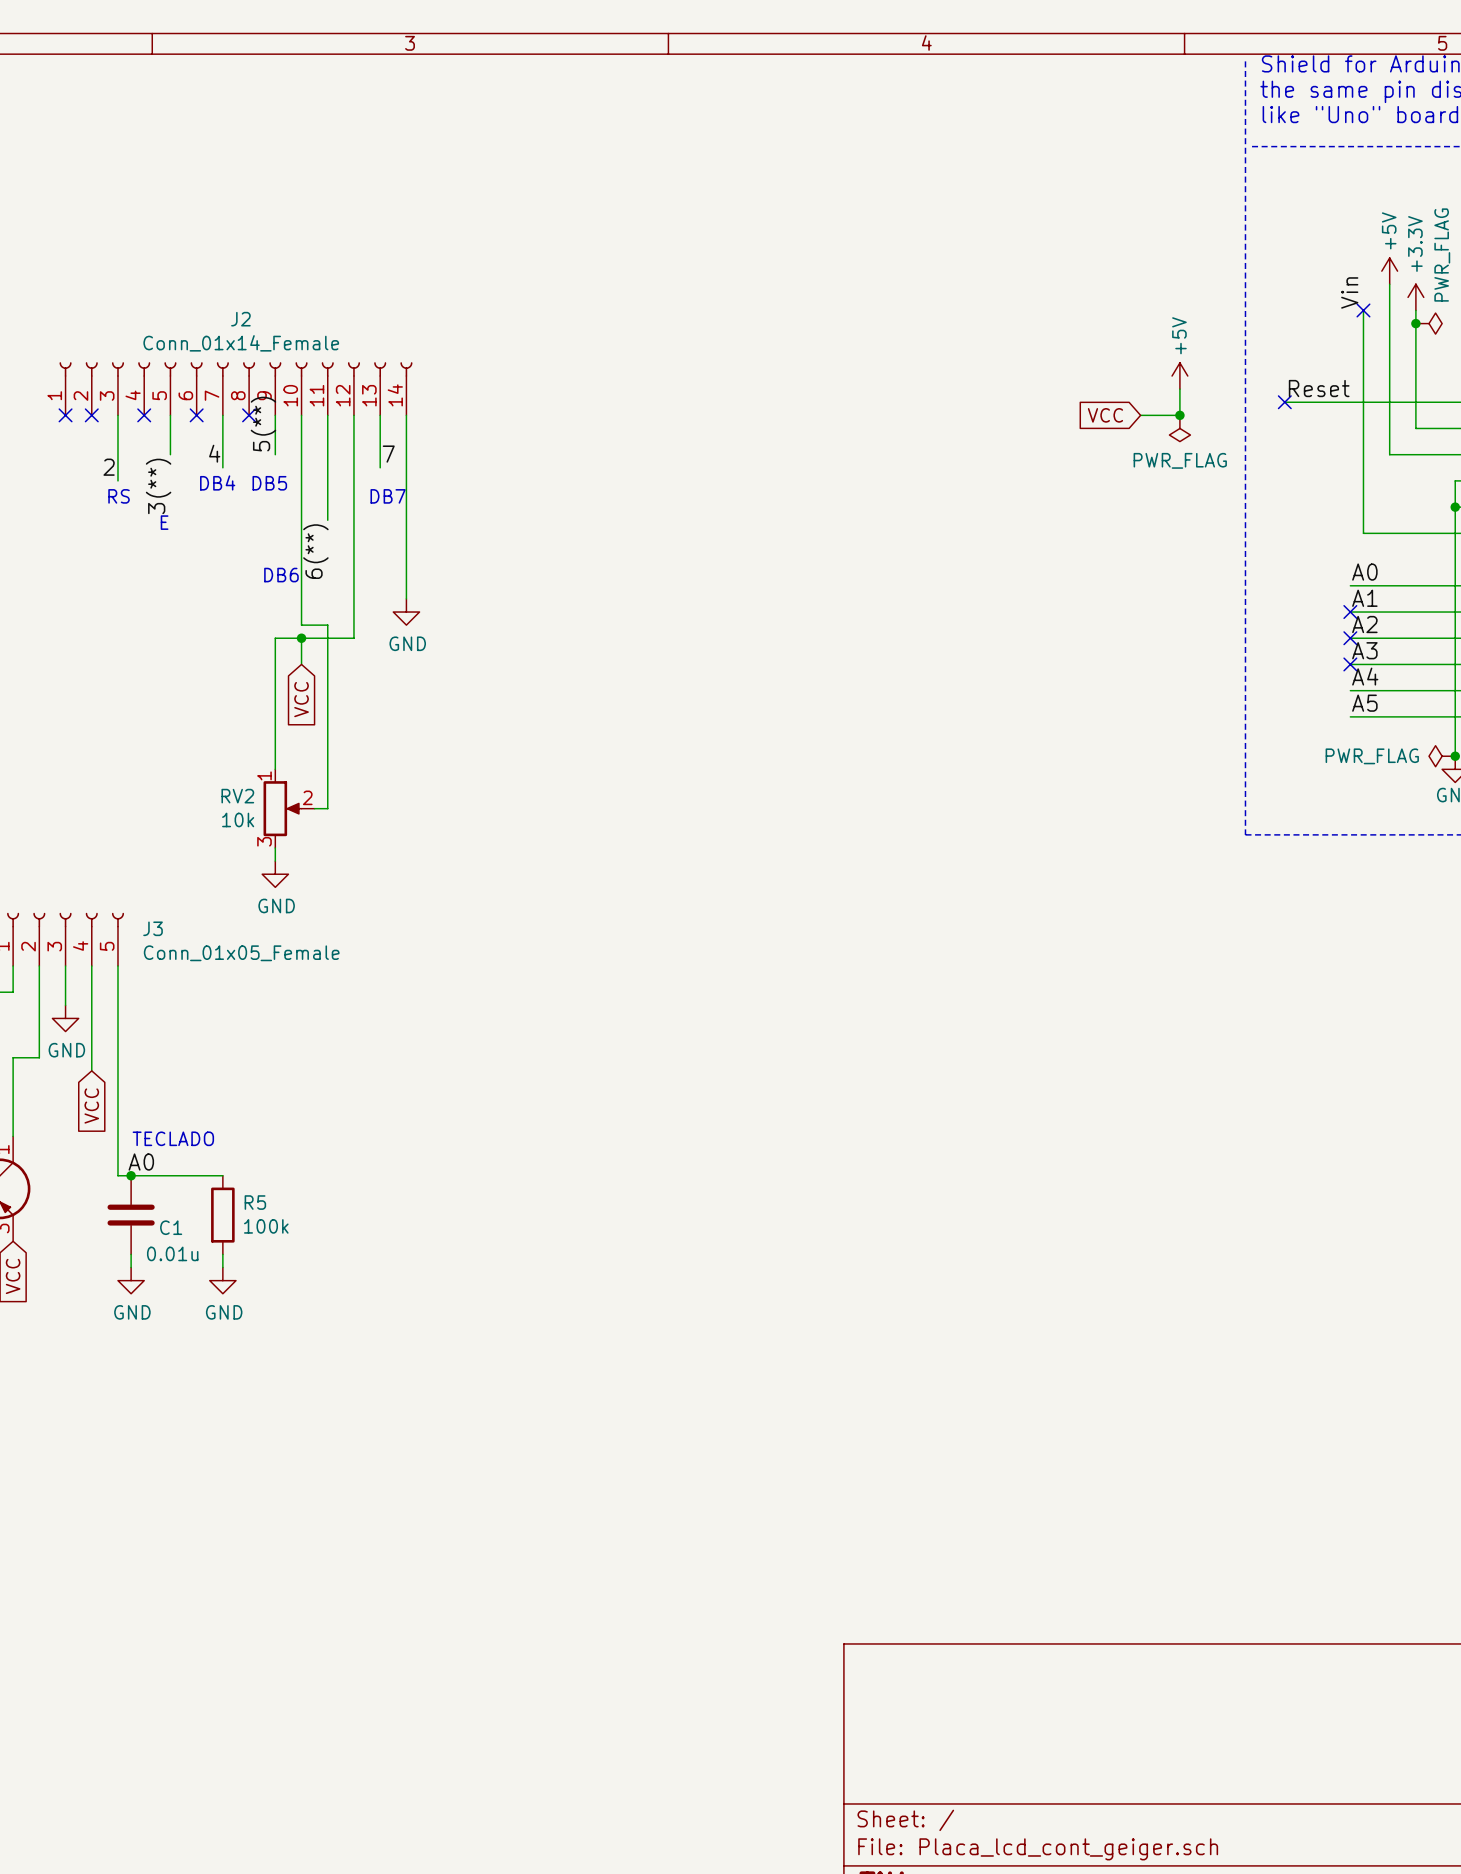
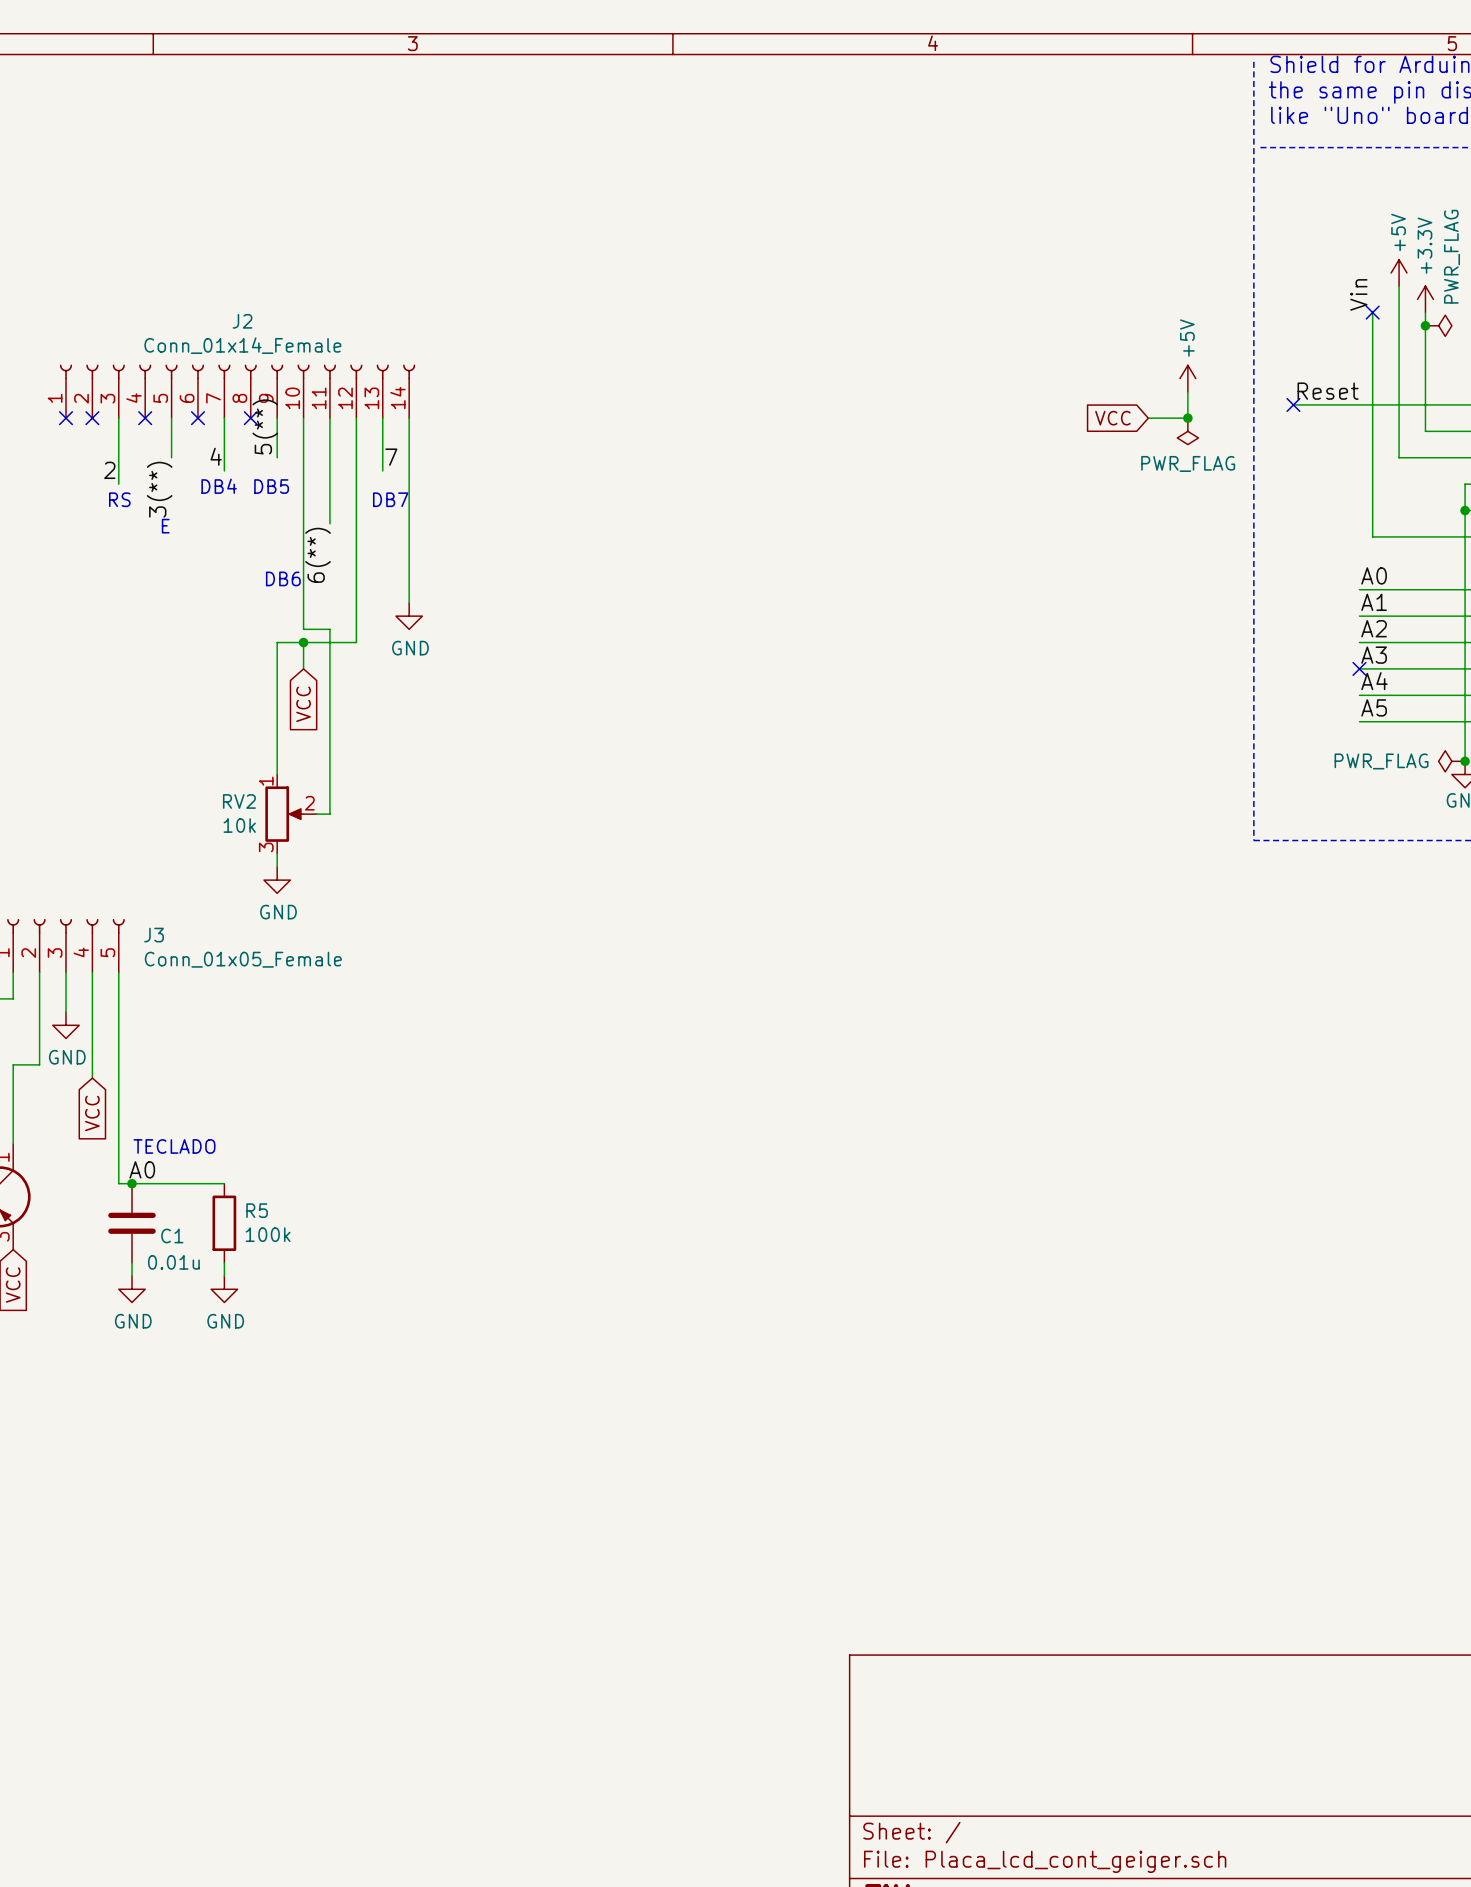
no-connect mark: (1350, 612) -> none
no-connect mark: (1350, 638) -> none

